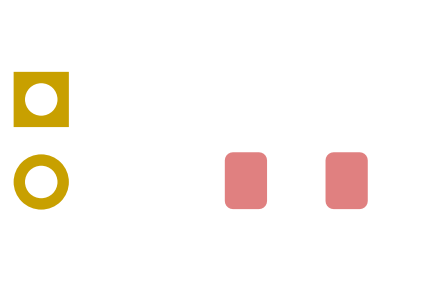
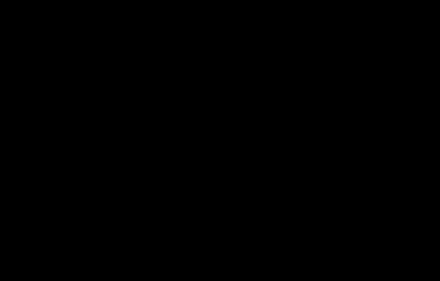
part: (41, 140) -> none
part: (296, 180) -> none

